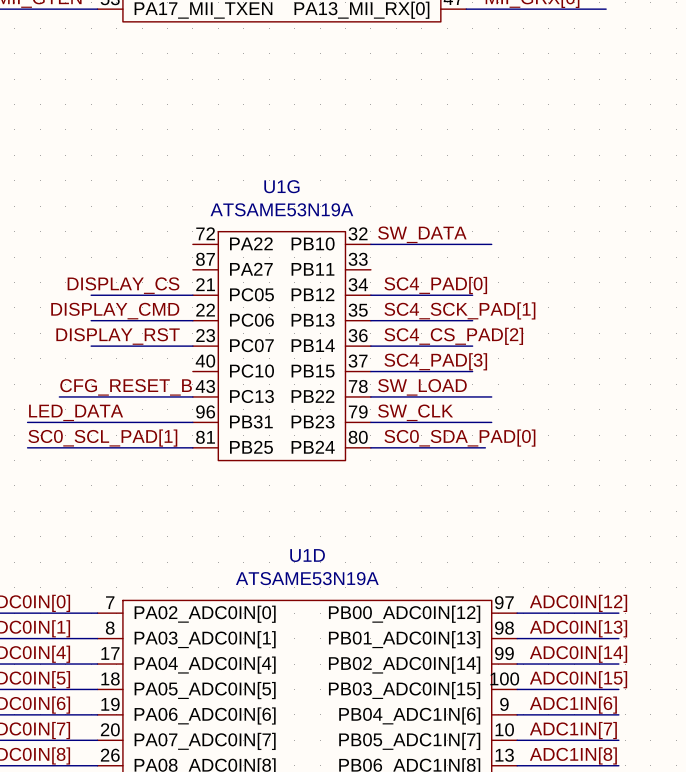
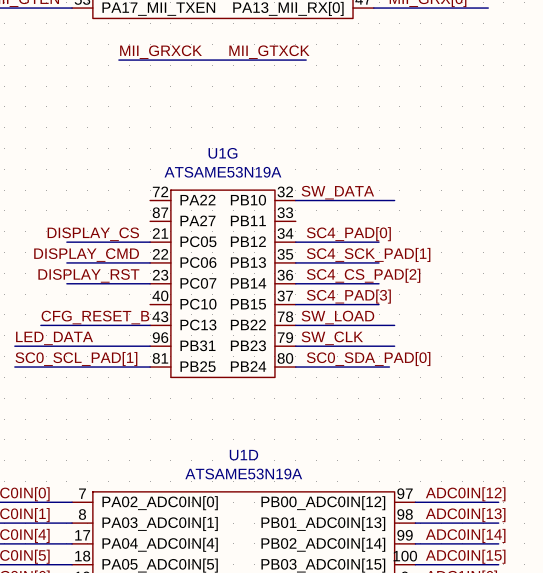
label: none -> MII_GRXCK (161, 52)
label: none -> MII_GTXCK (269, 52)
wire: none -> (118, 60) (306, 60)

